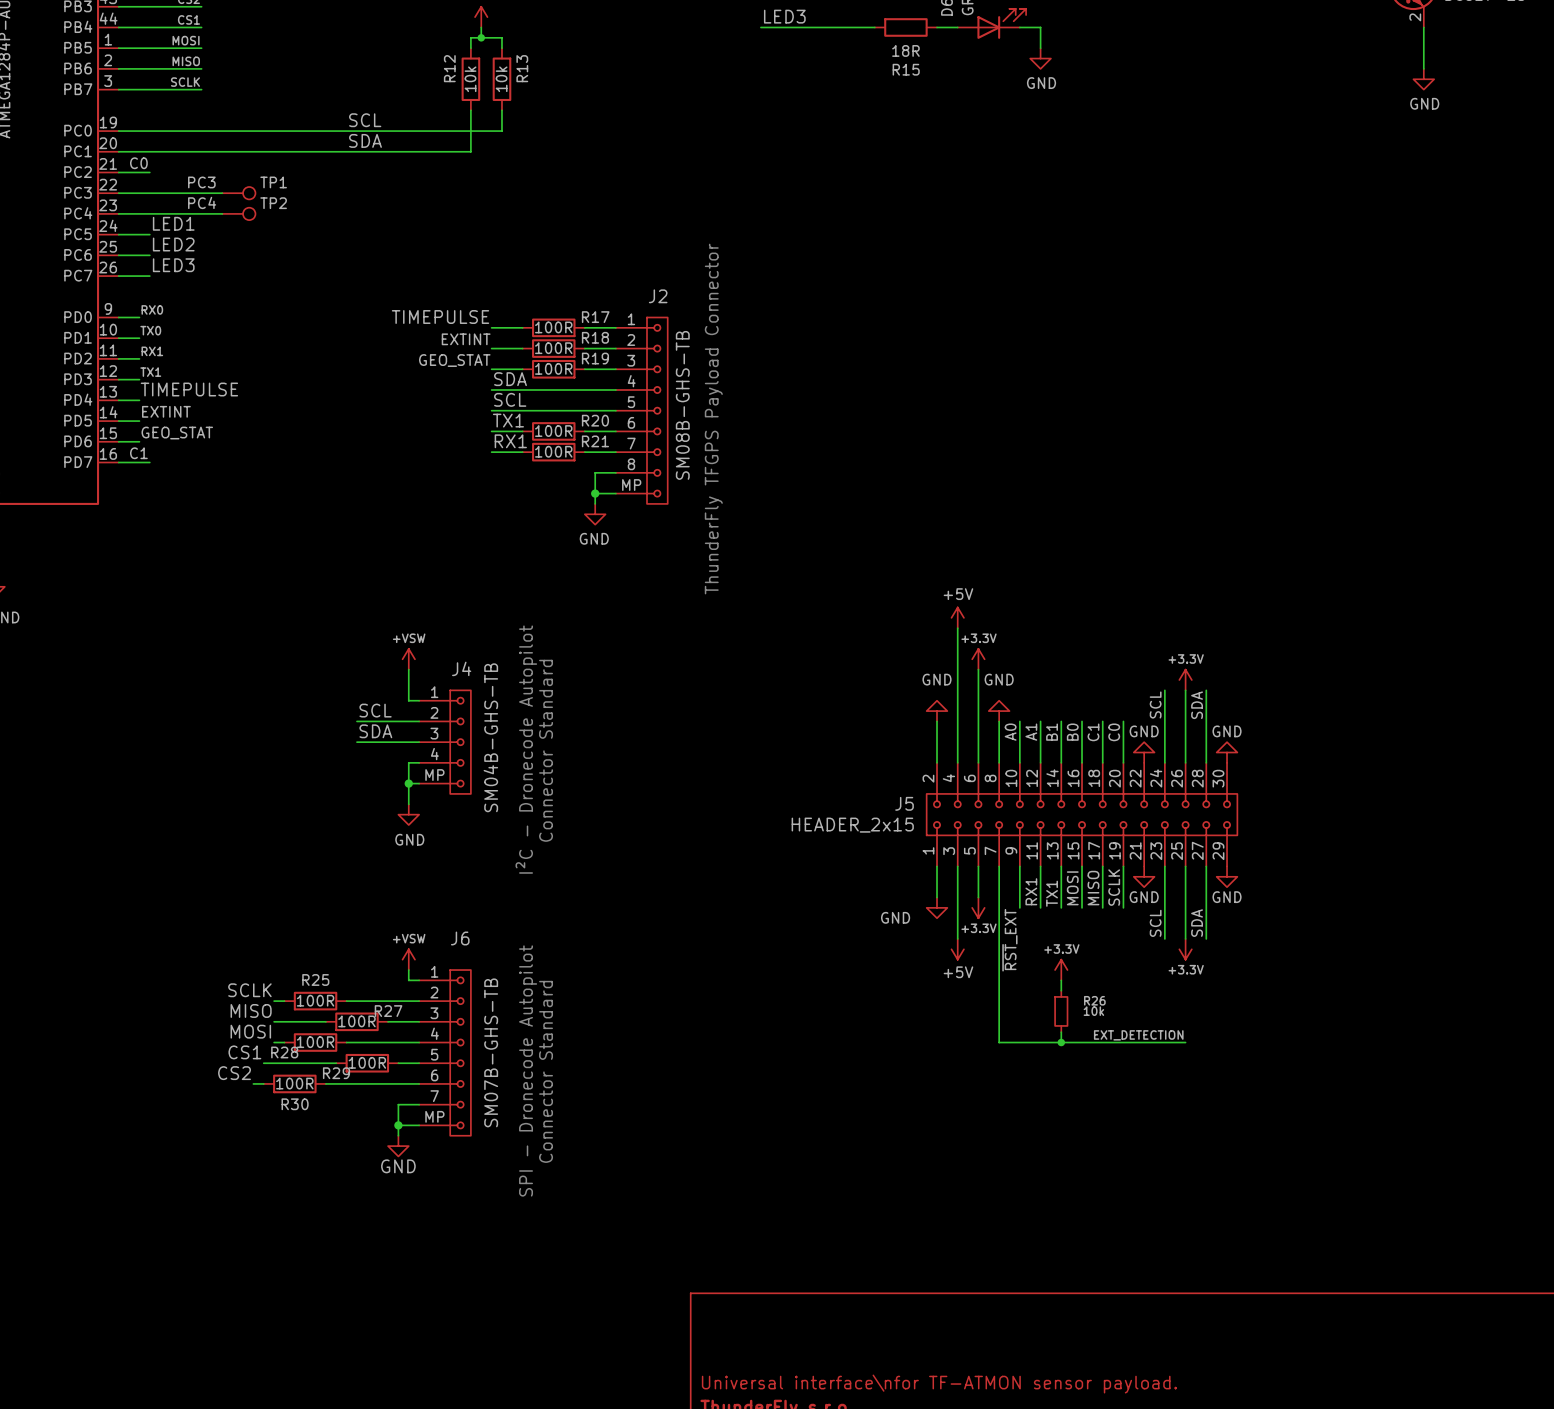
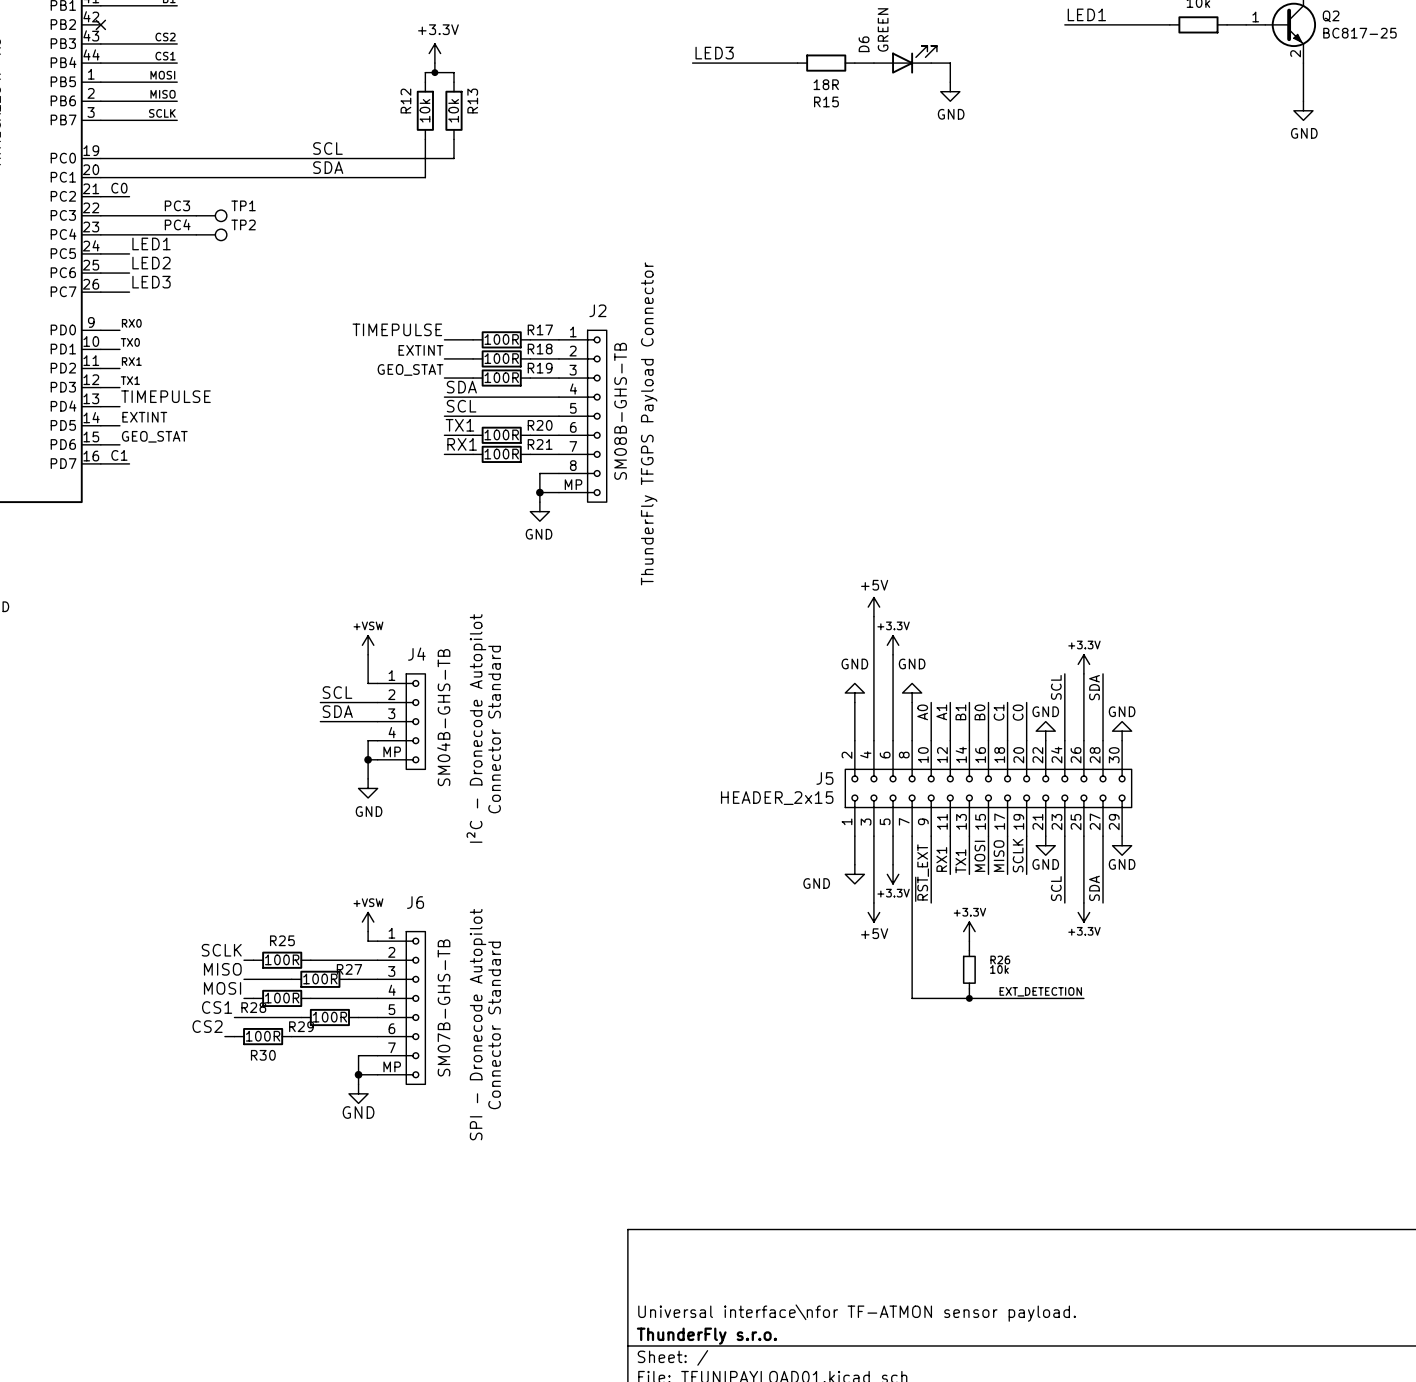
wire: none -> (931, 874) (931, 902)
label position: ~{RST}_EXT (1009, 940) -> ~{RST}_EXT (922, 873)

